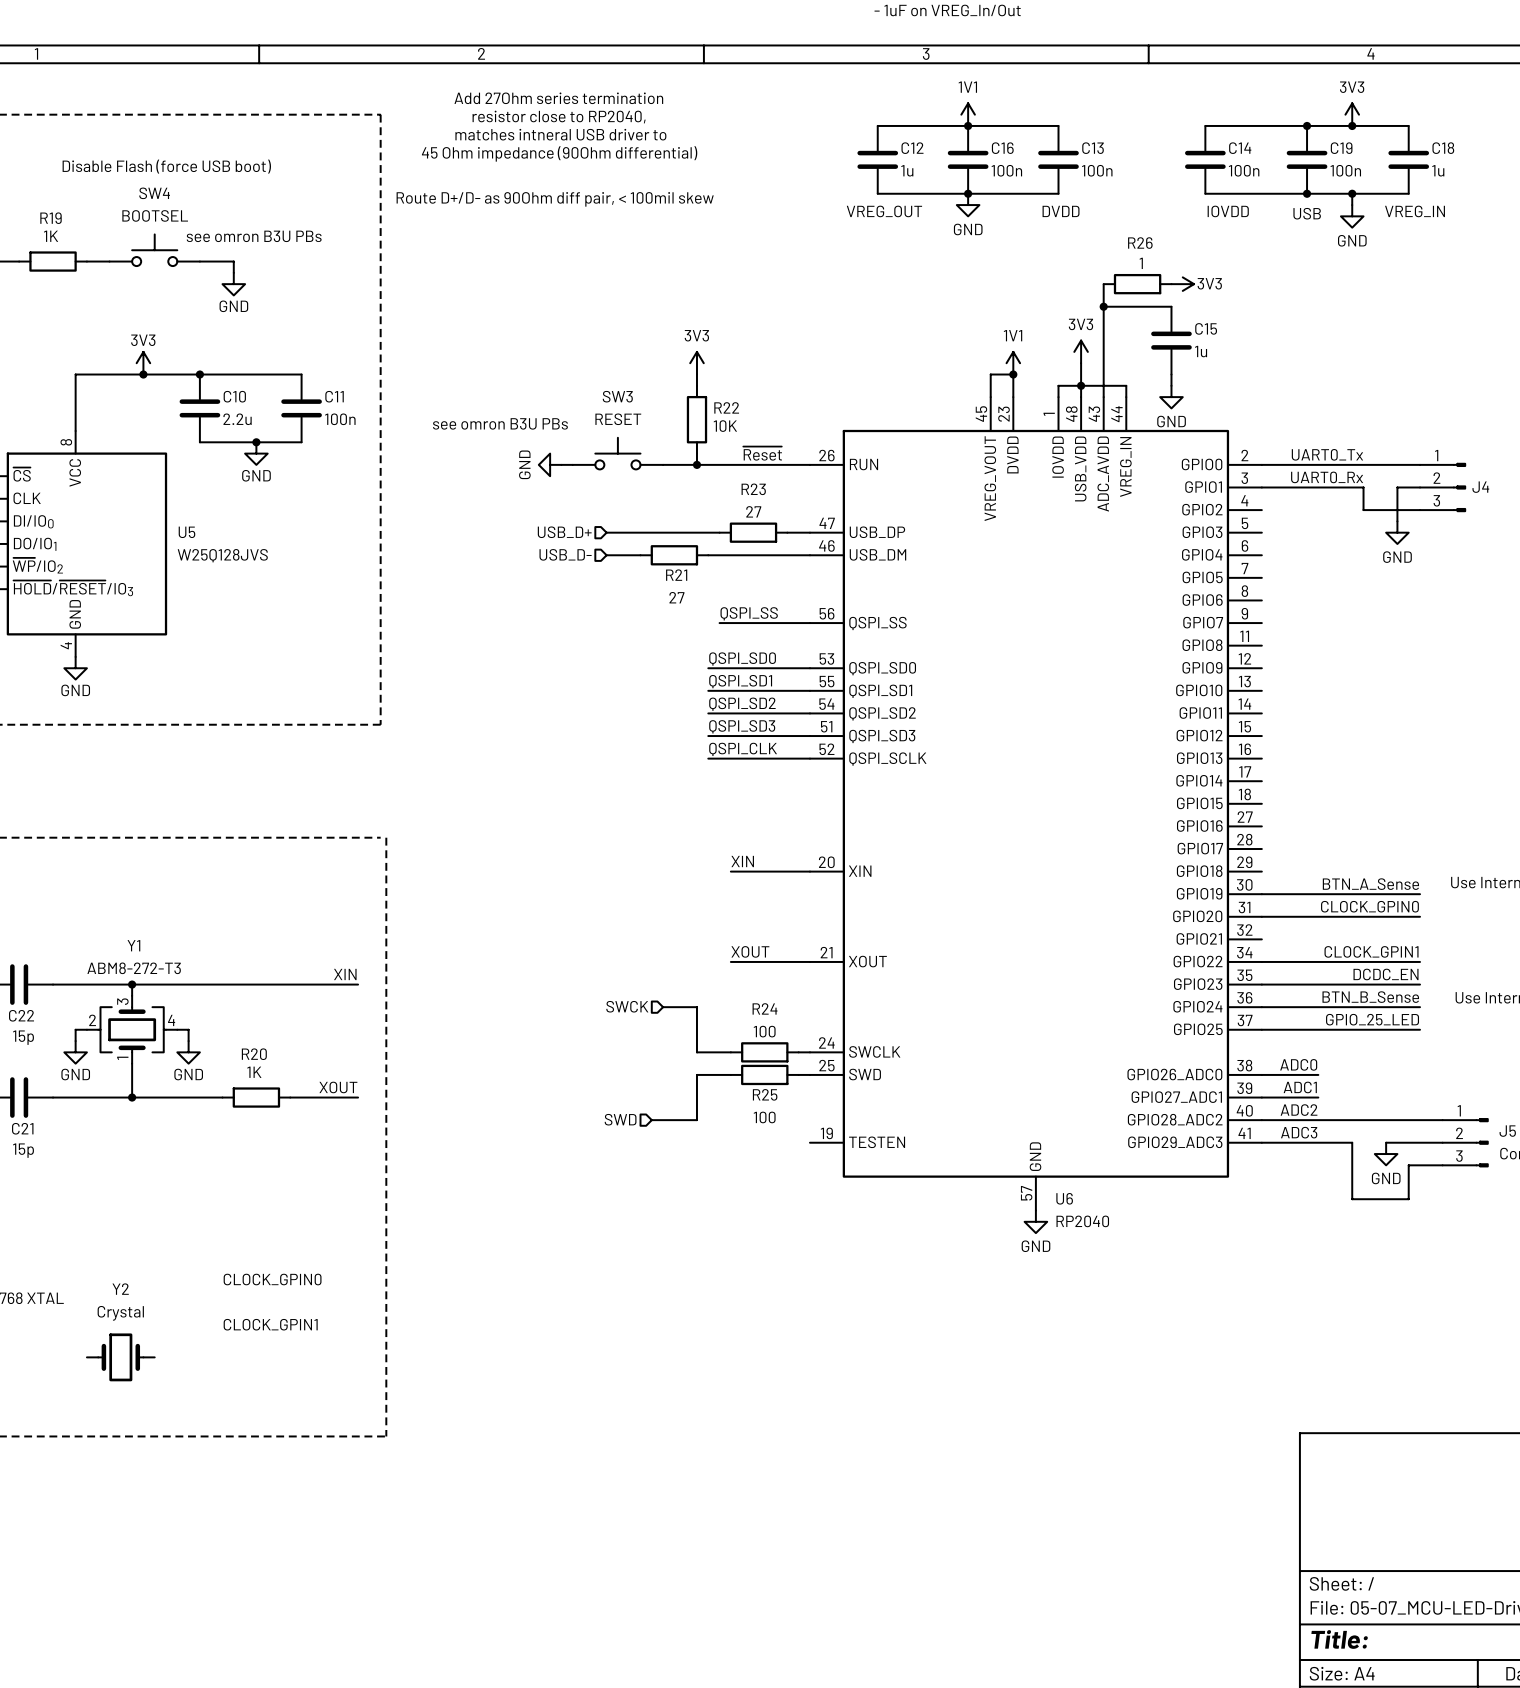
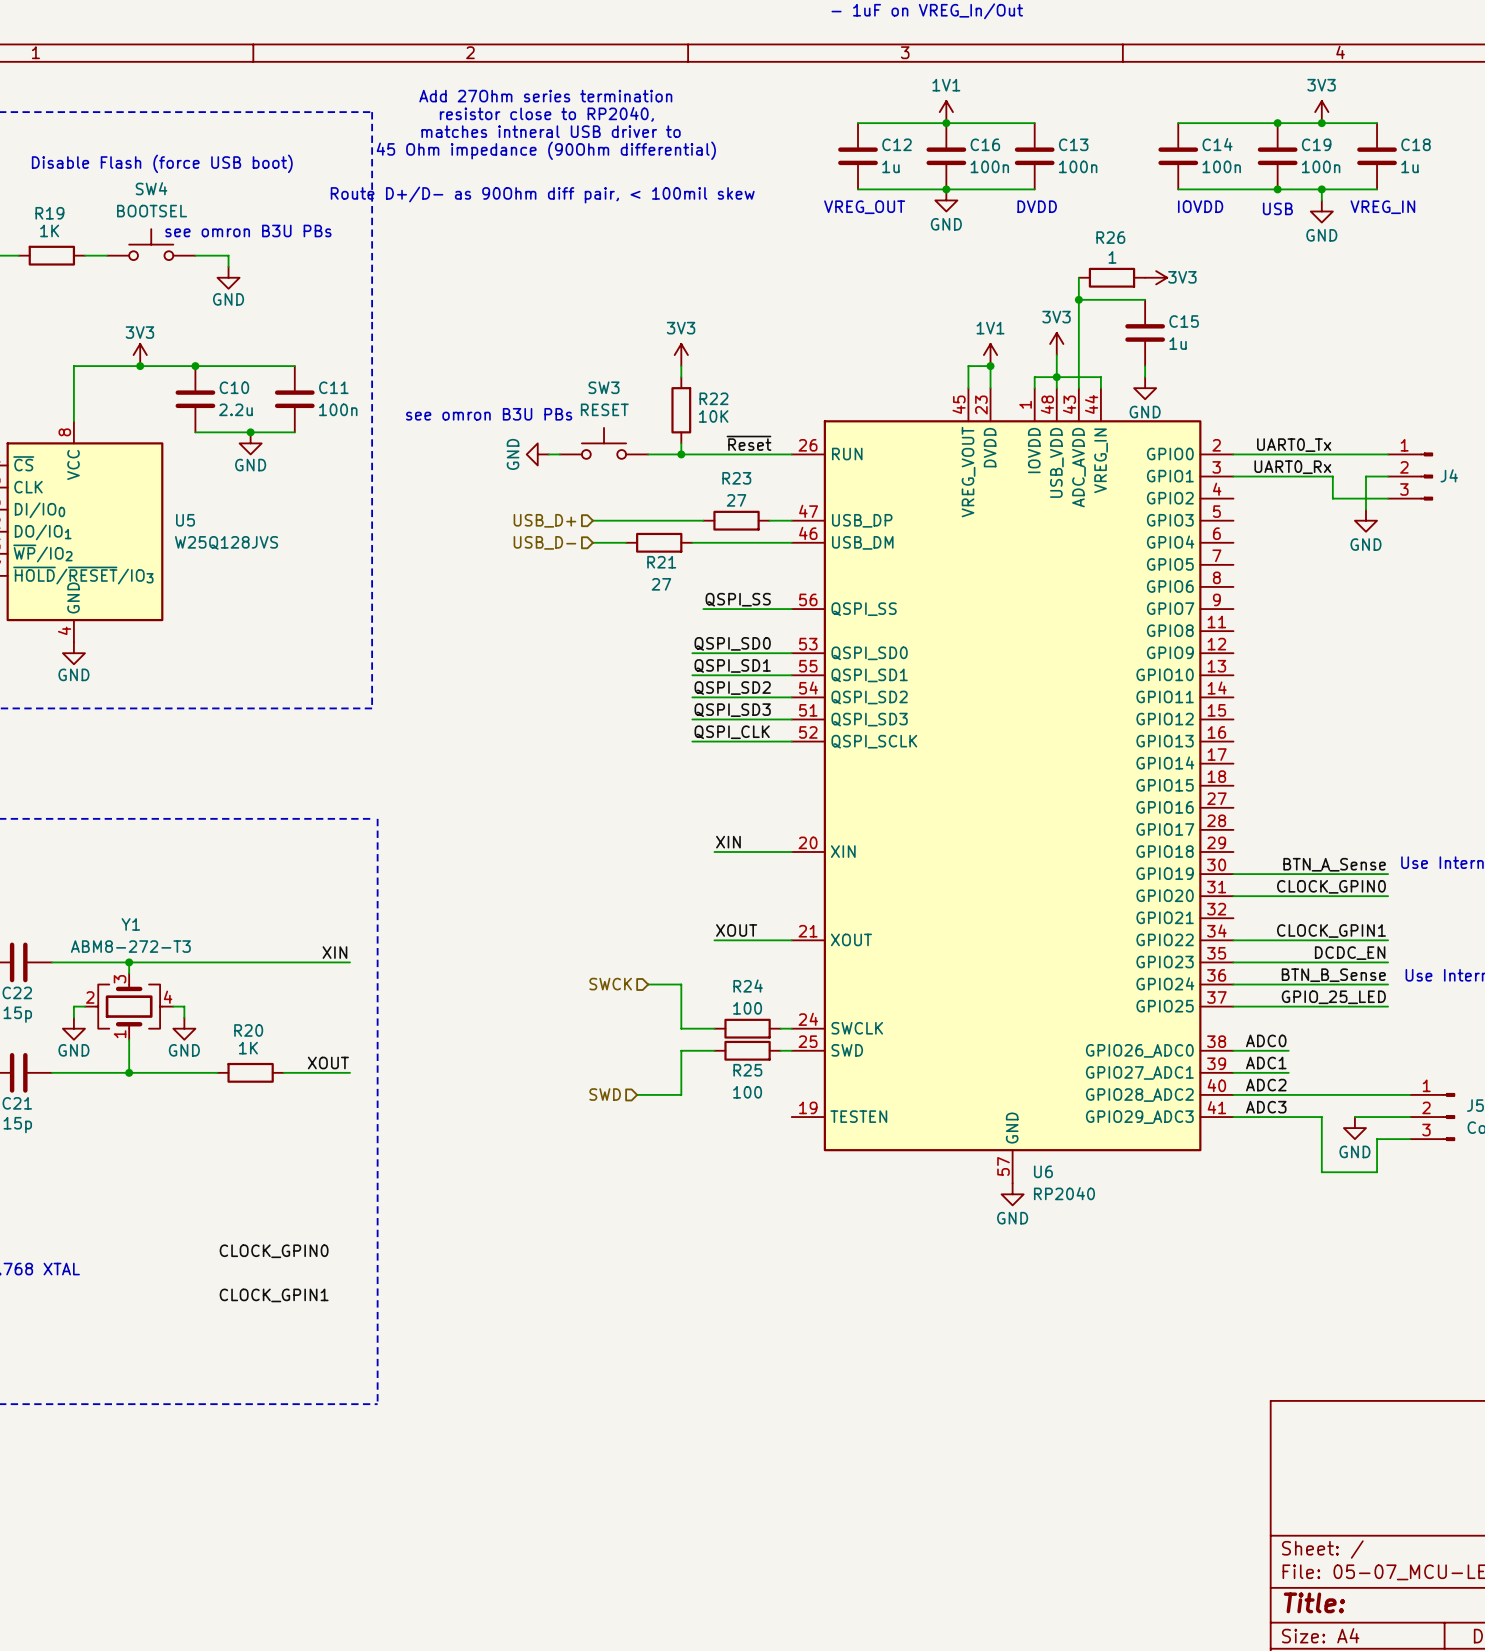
Y2: Crystal (120, 1357) -> none

